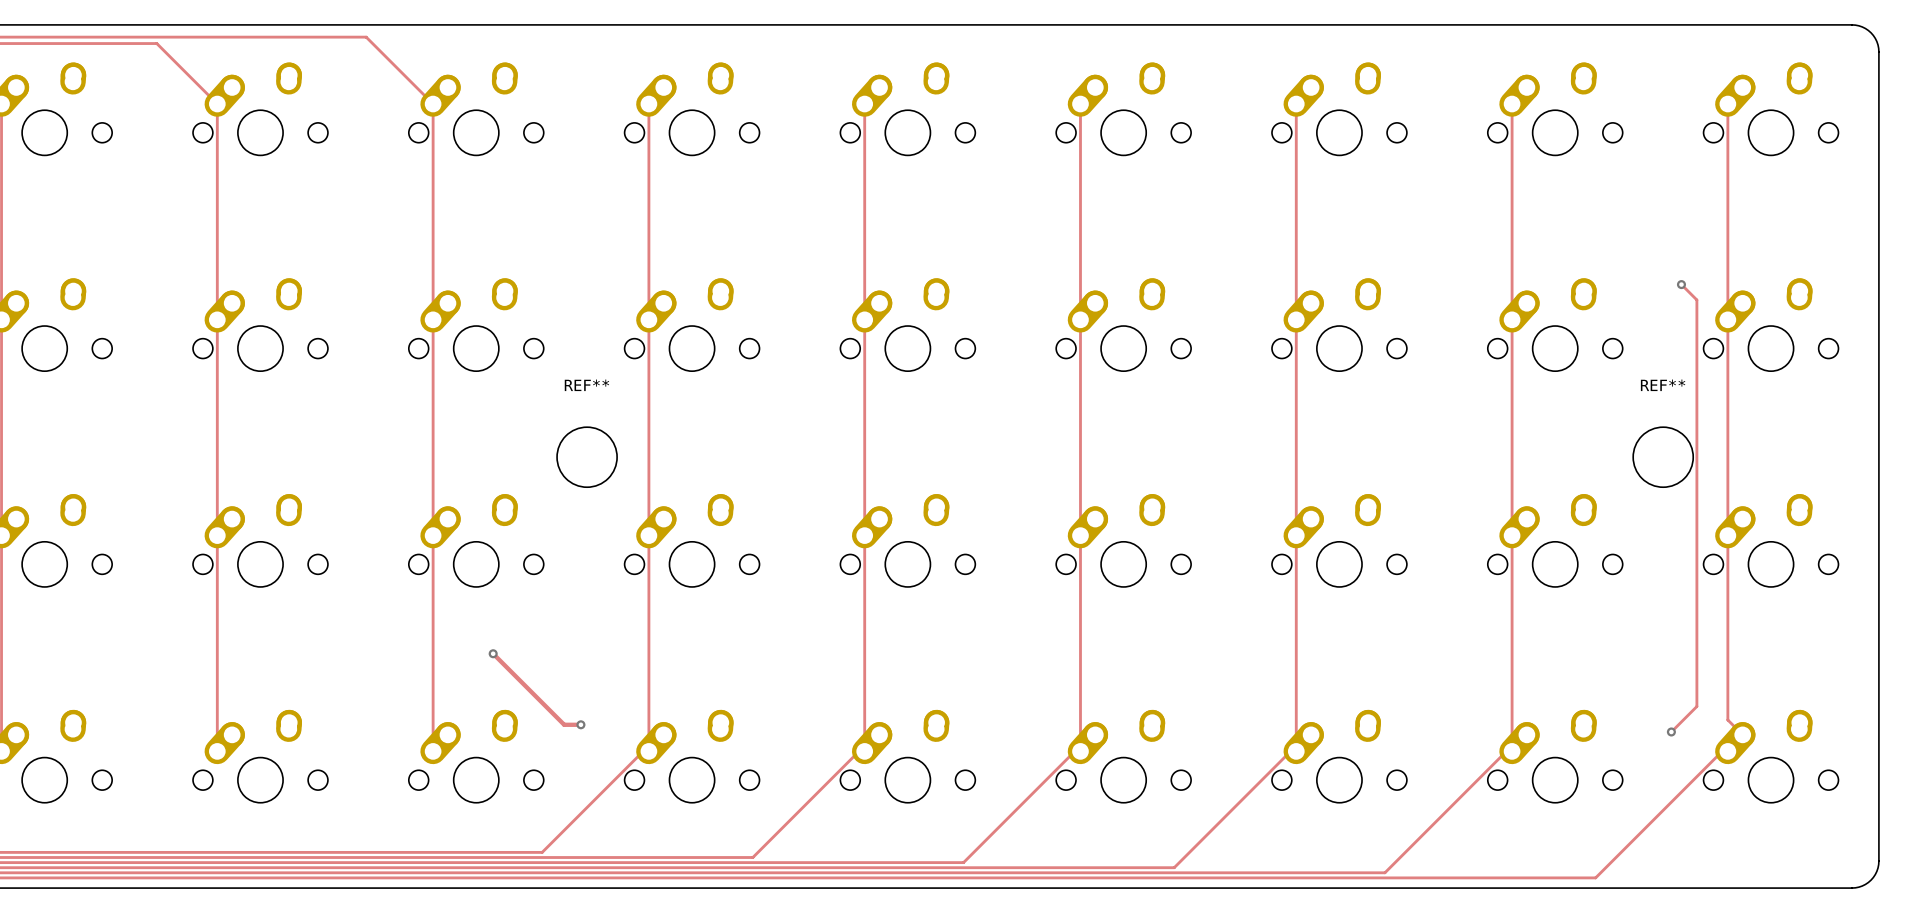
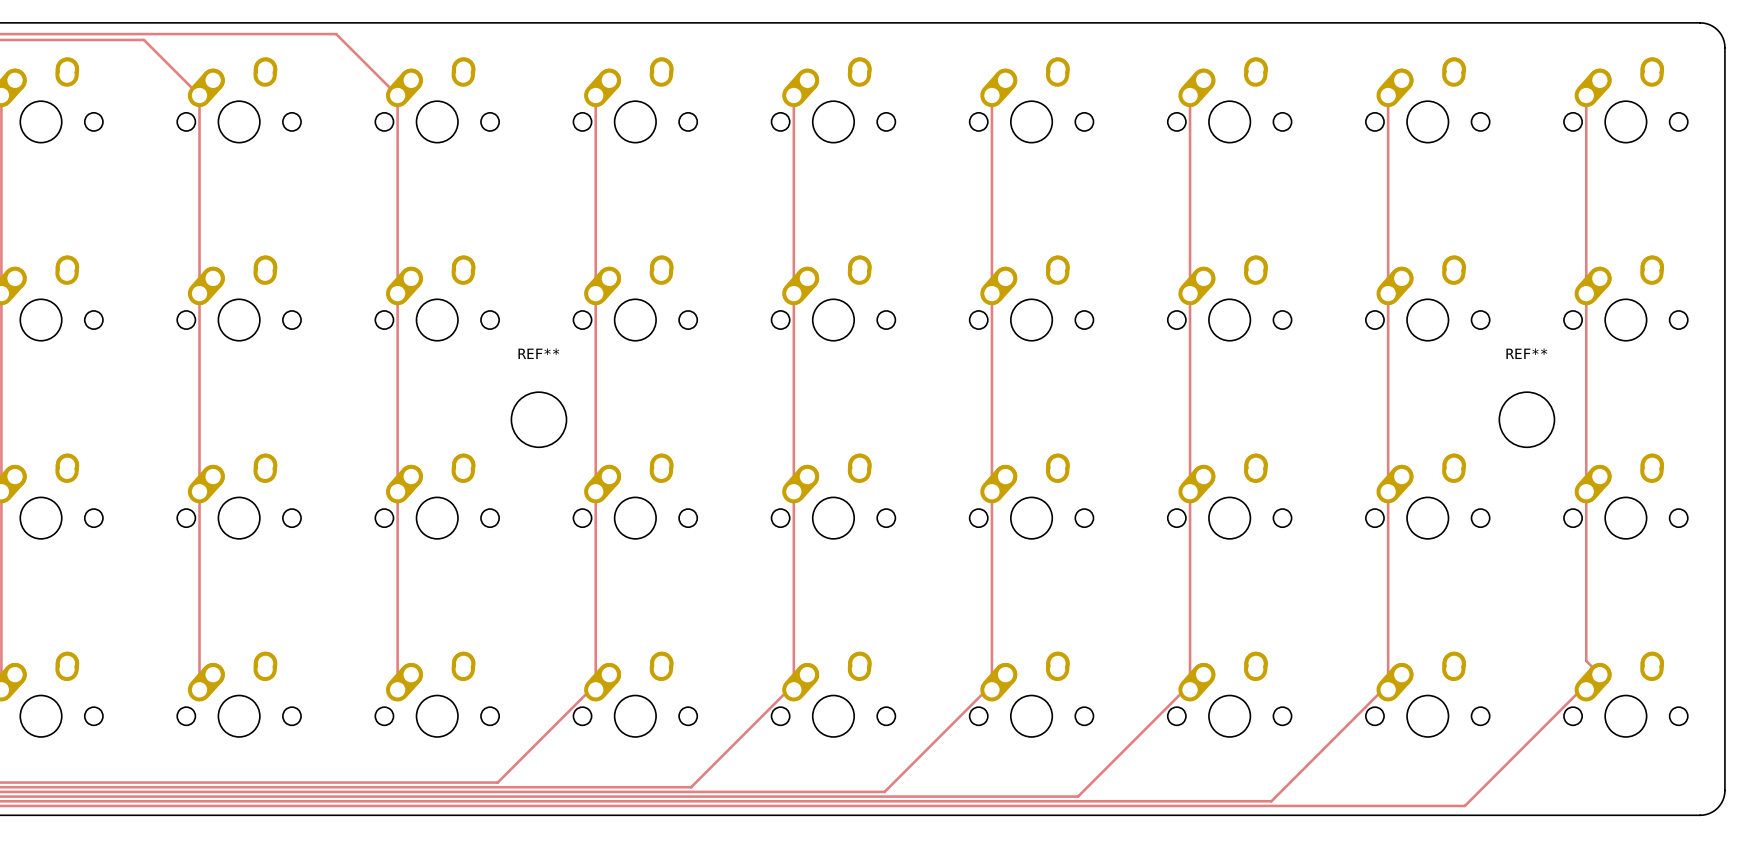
track: (1681, 284) (1696, 300) (1696, 706) (1671, 731) -> none
via: (1681, 284) -> none
track: (493, 653) (564, 724) (580, 724) -> none
via: (493, 653) -> none
via: (580, 724) -> none
via: (1671, 731) -> none

